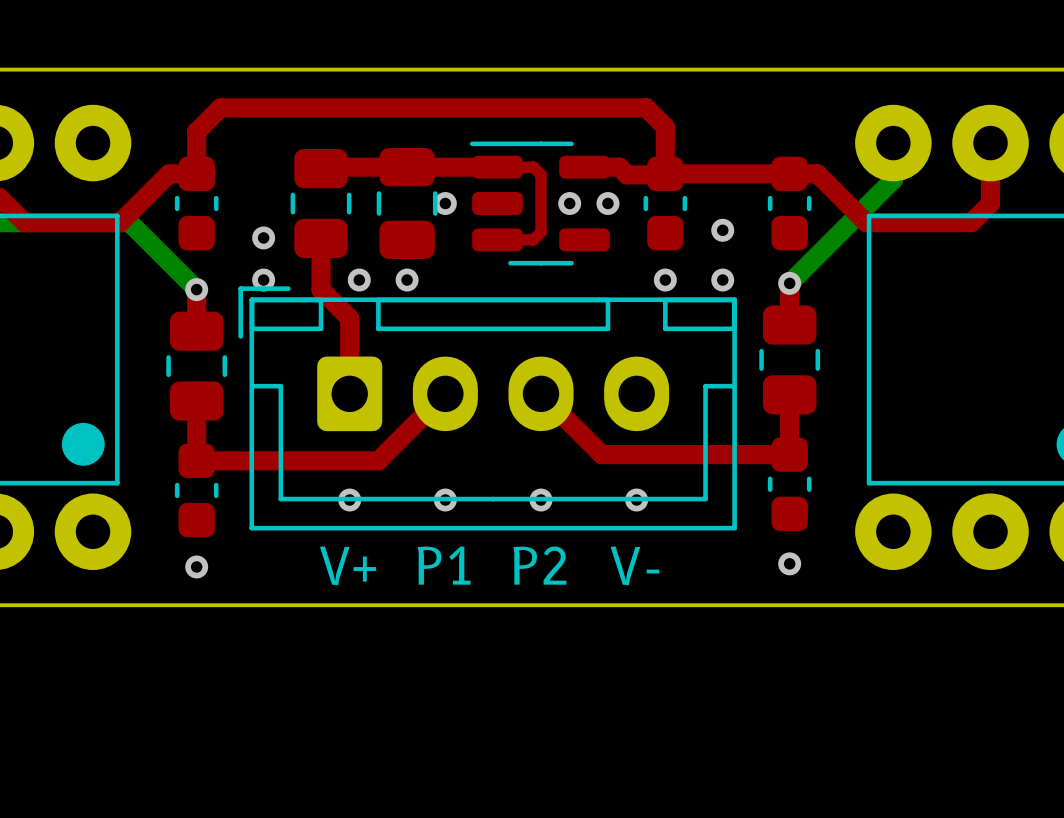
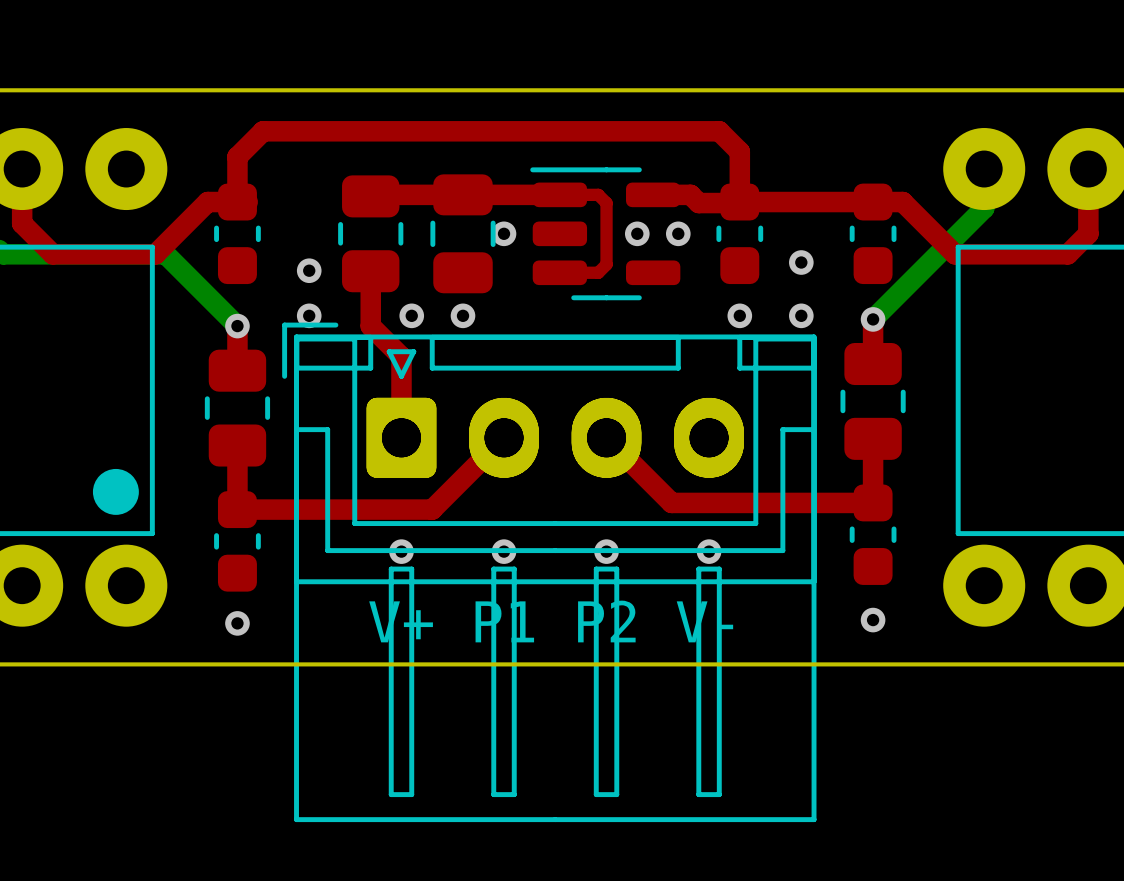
part: none -> (555, 579)

